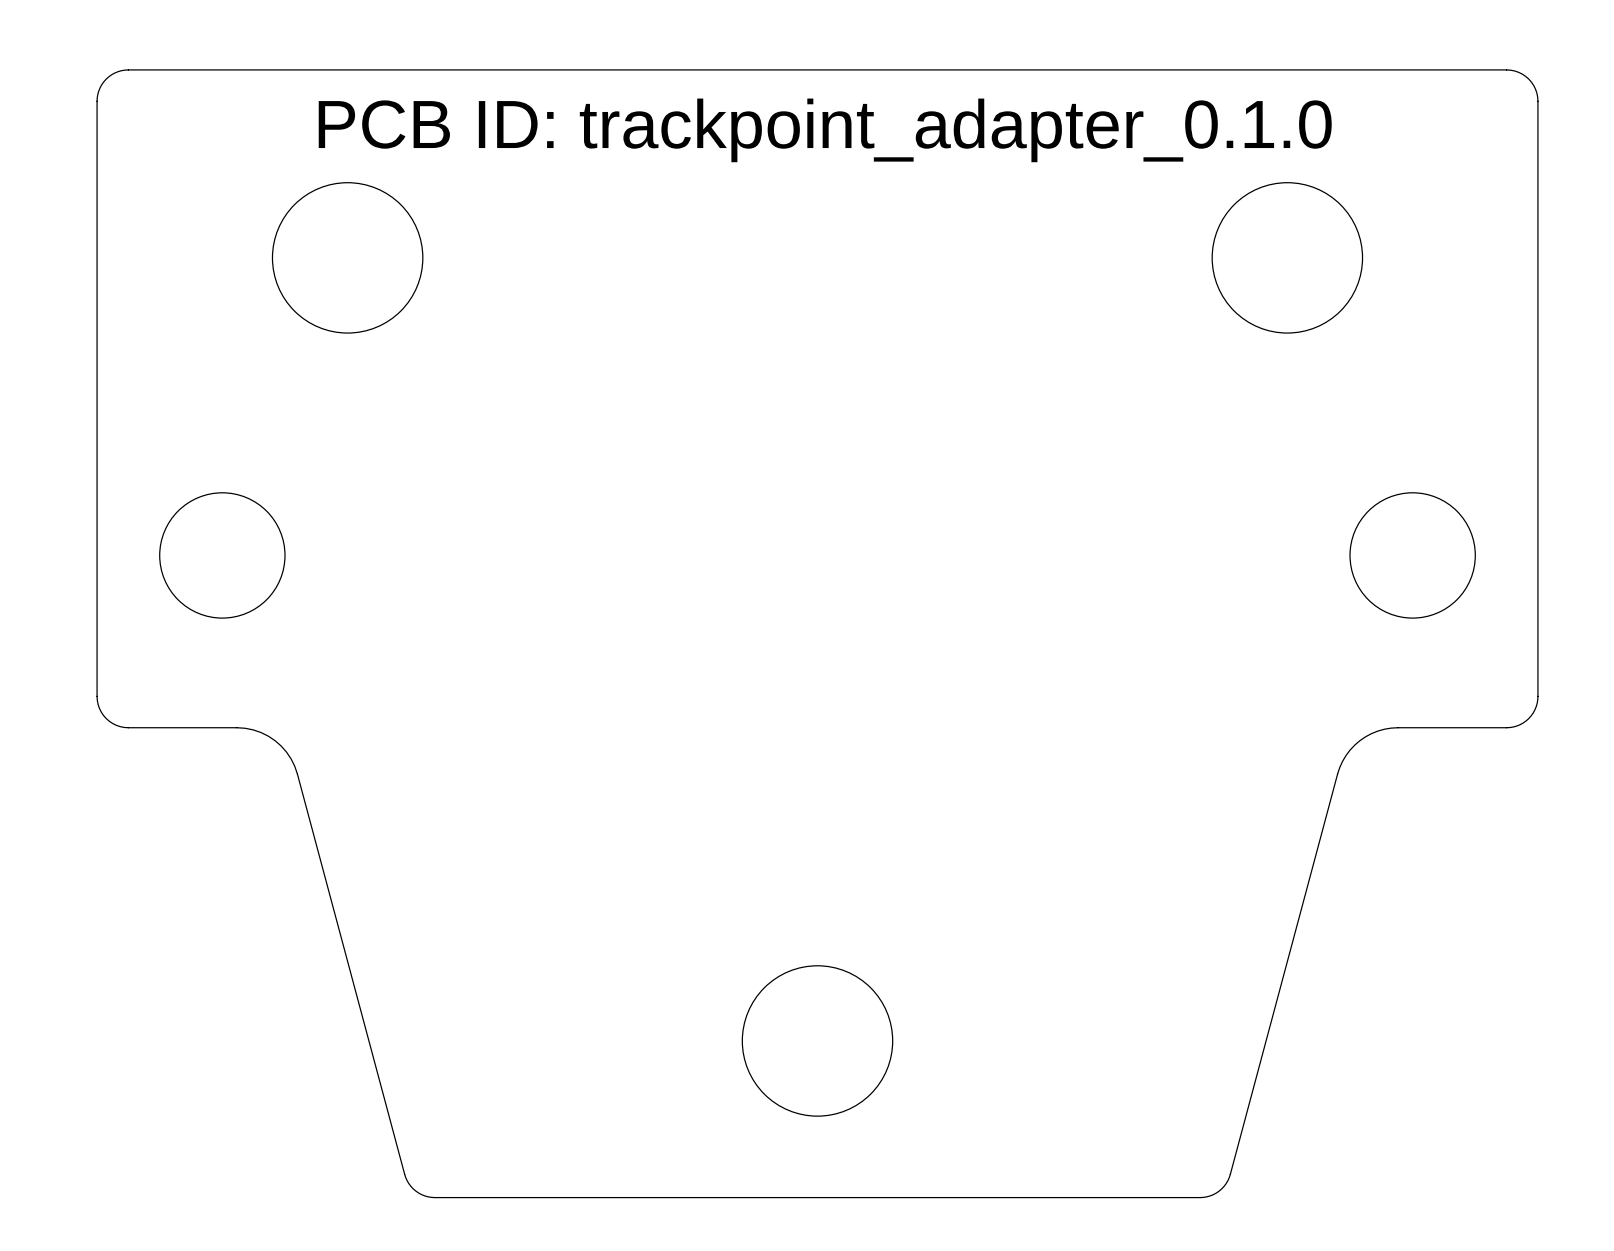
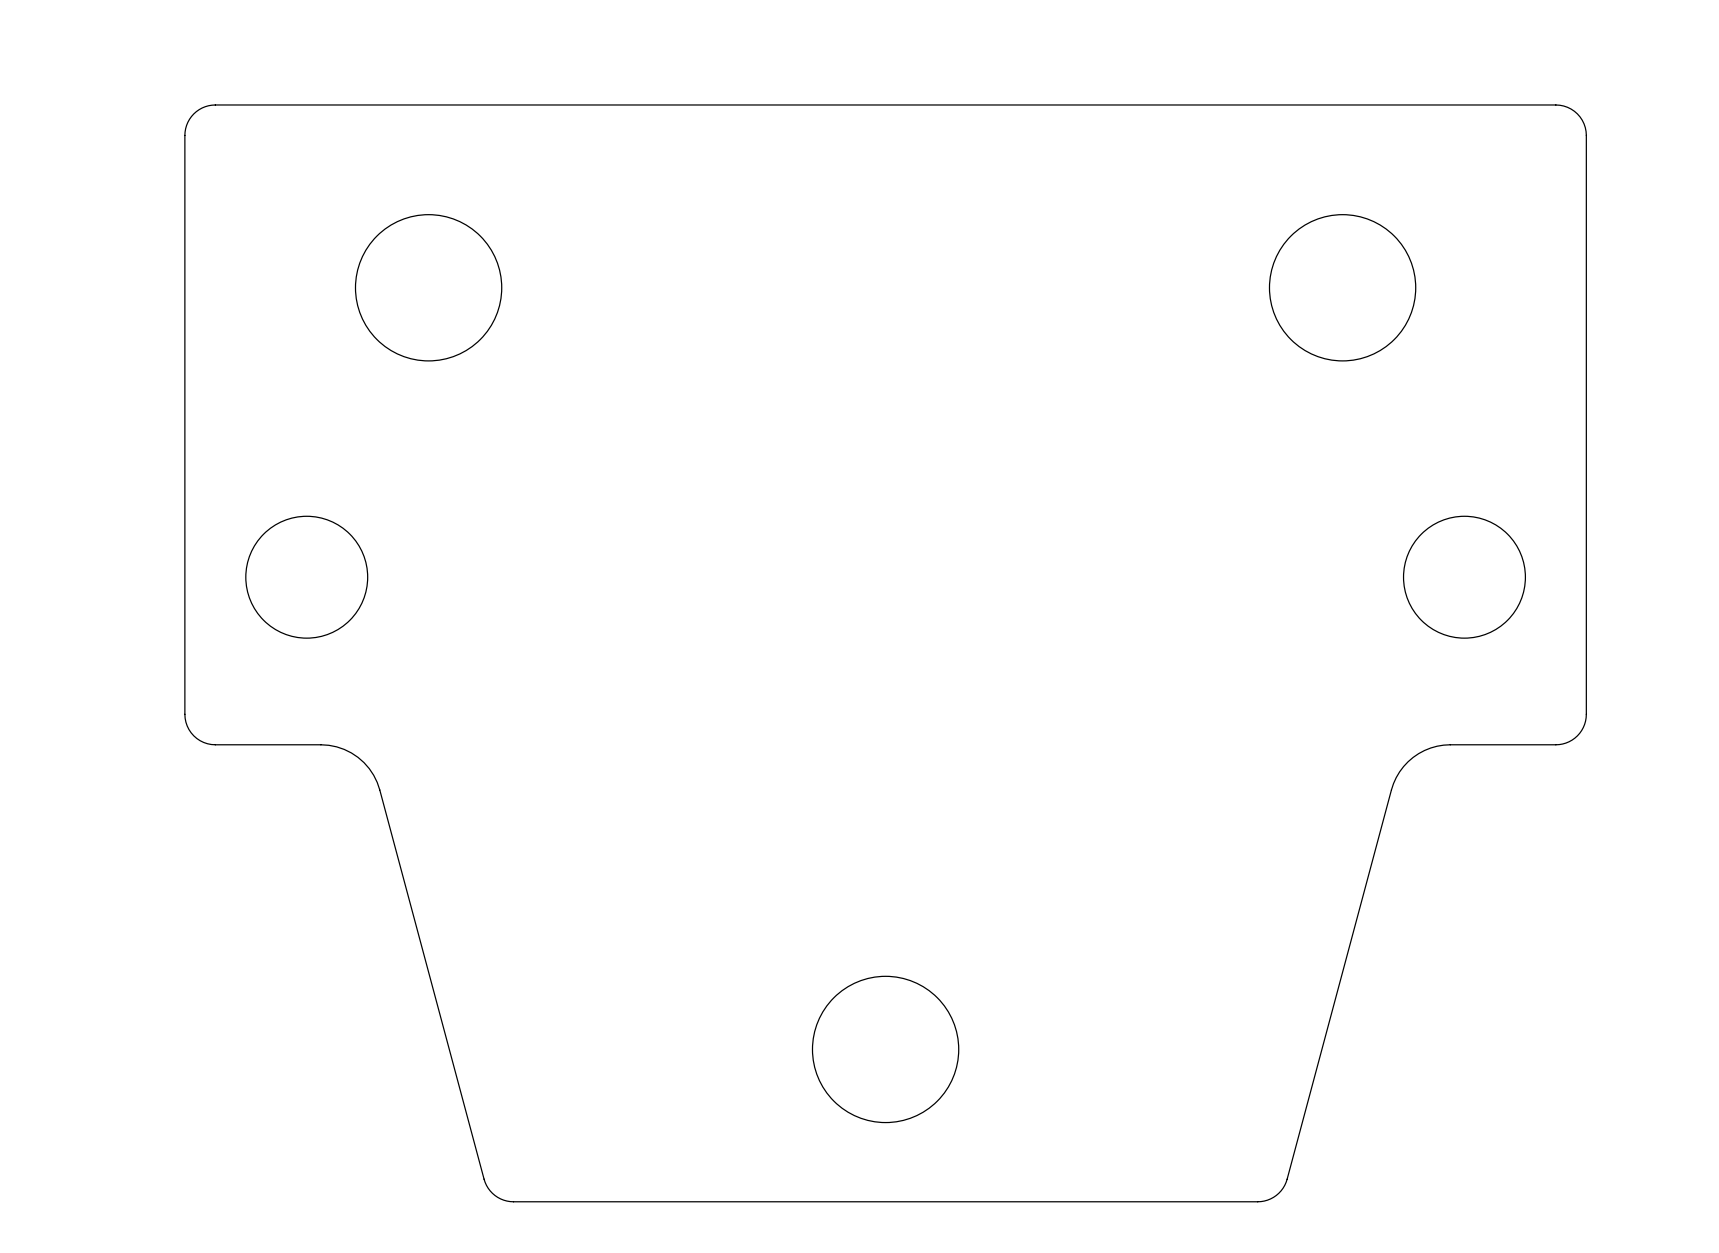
text: PCB ID: trackpoint_adapter_0.1.0 (825, 130) -> none

